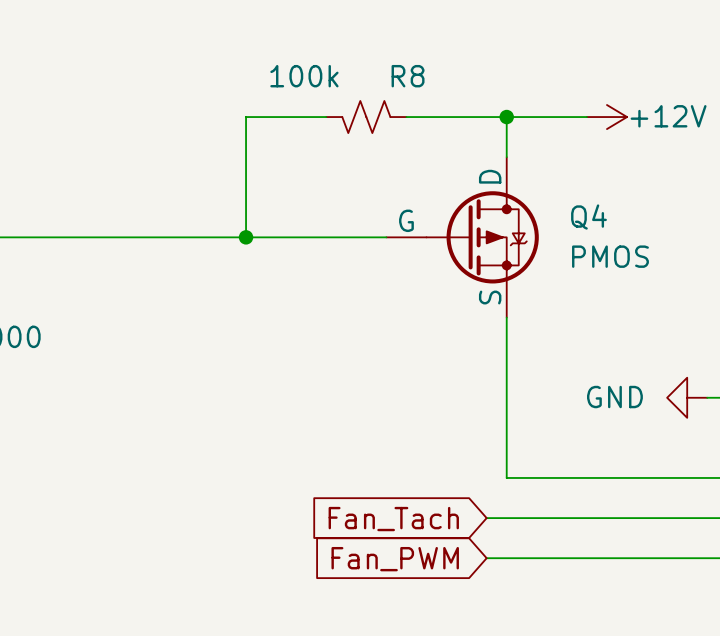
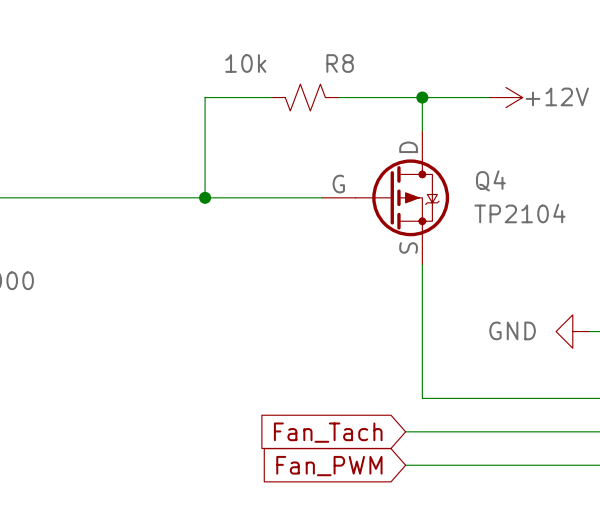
R8 value: 100k (304, 76) -> 10k (245, 63)
Q4 value: PMOS (610, 256) -> TP2104 (519, 213)

